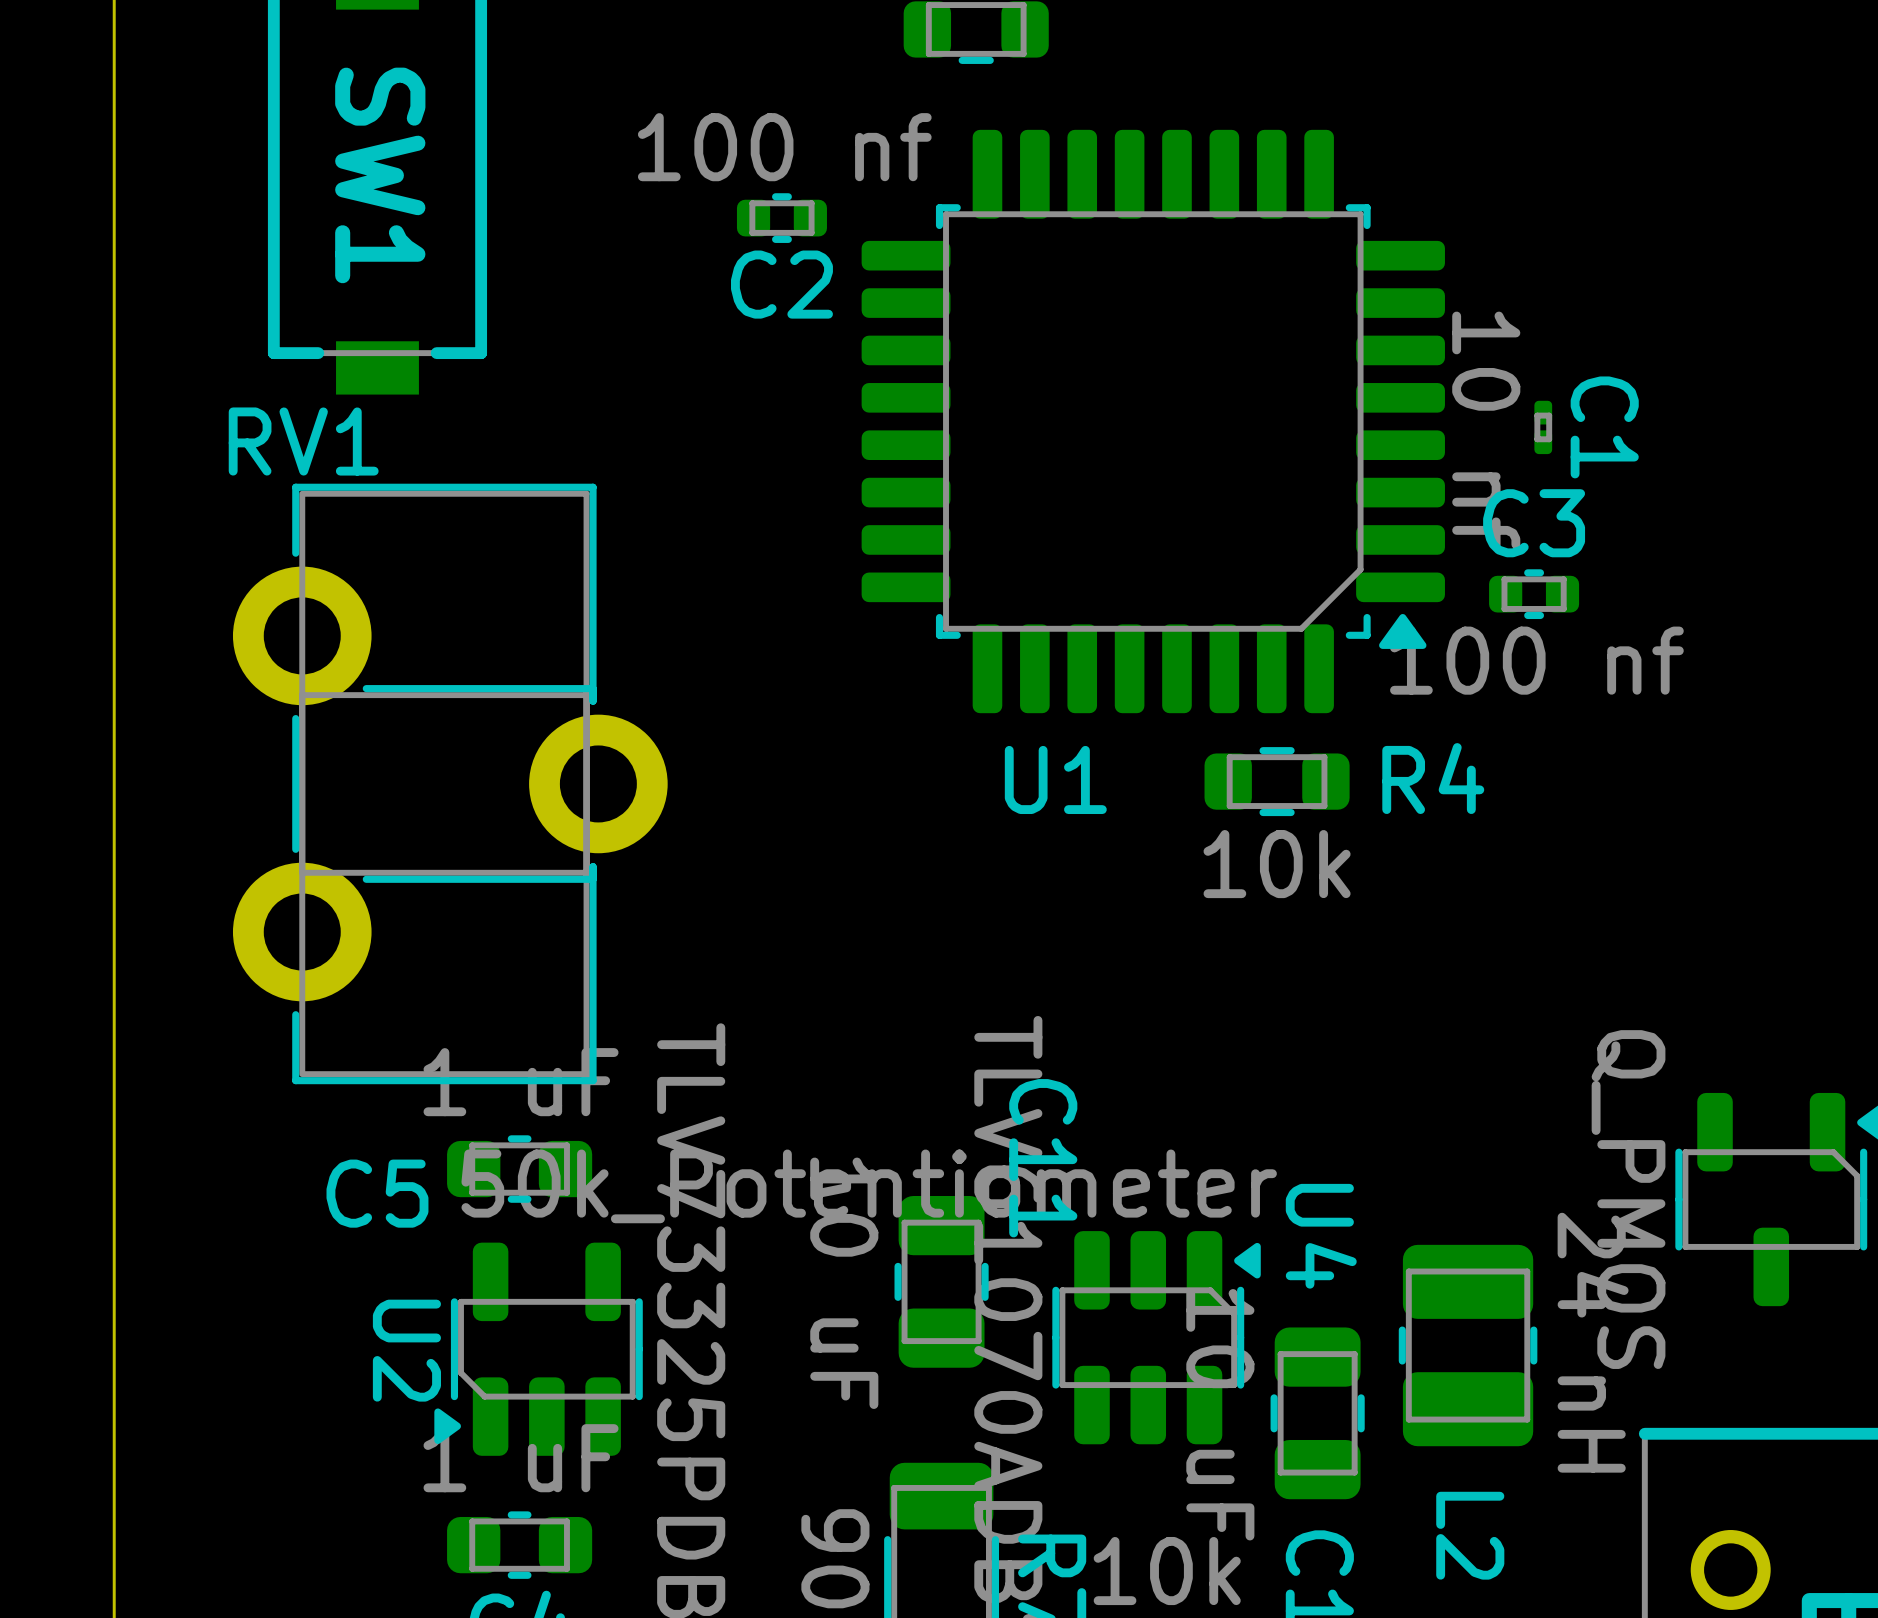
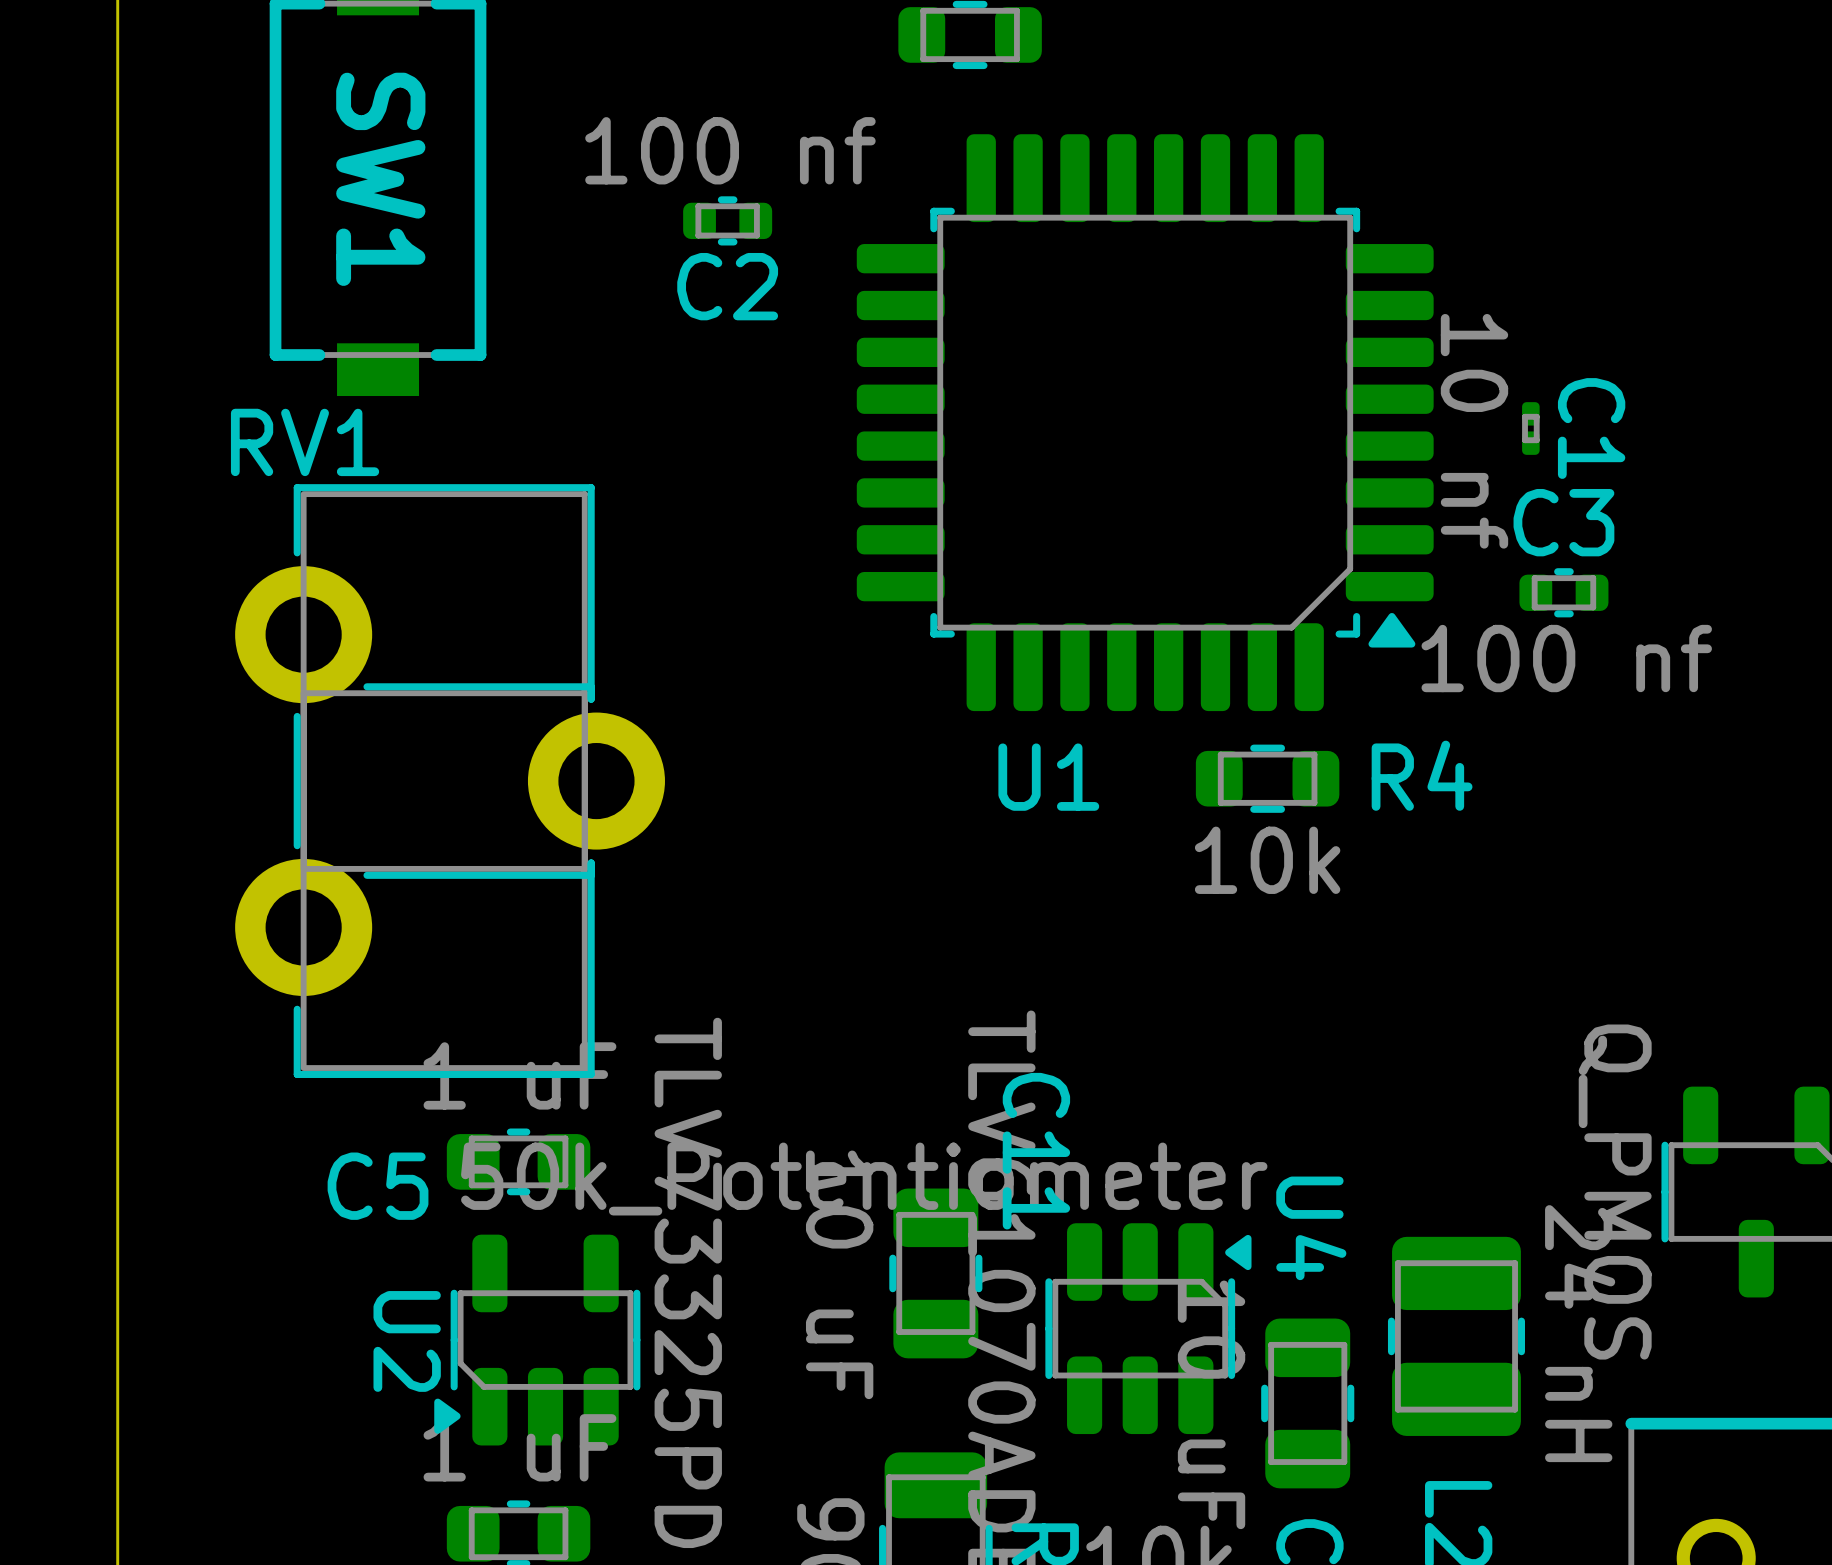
C2 position: (781, 218) -> (727, 220)
C3 position: (1534, 594) -> (1563, 592)

